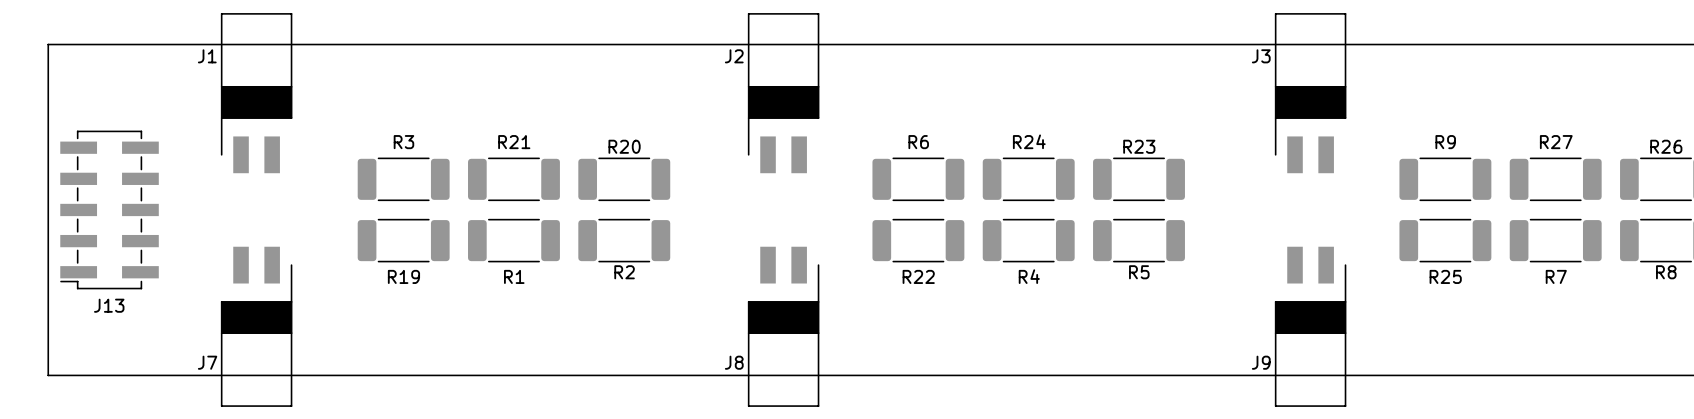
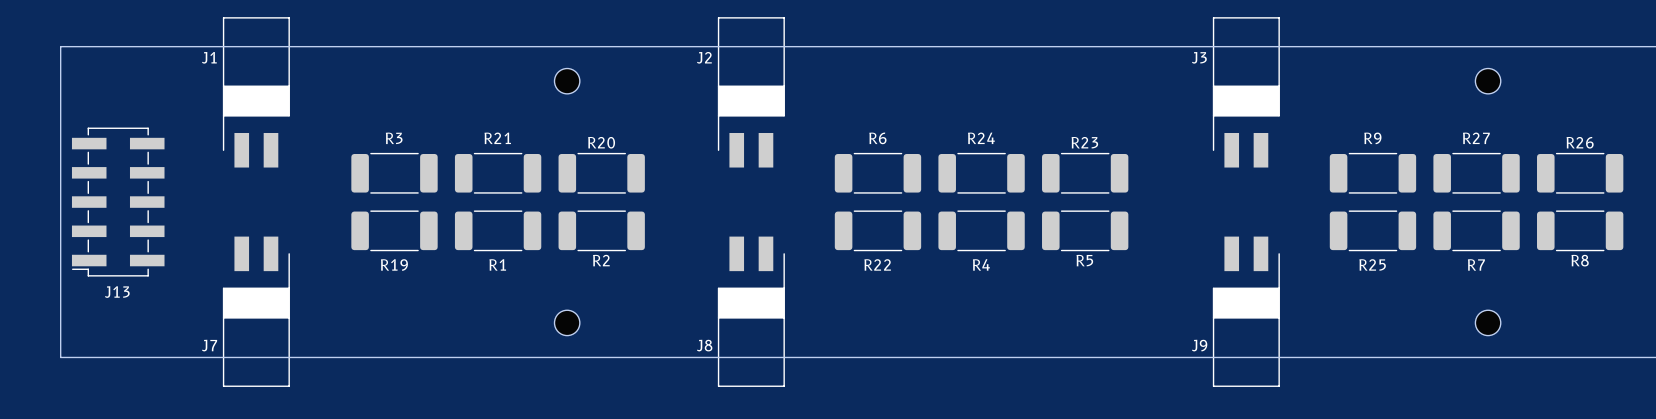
part: none -> (567, 81)
part: none -> (1488, 81)
part: none -> (567, 322)
part: none -> (1488, 322)

